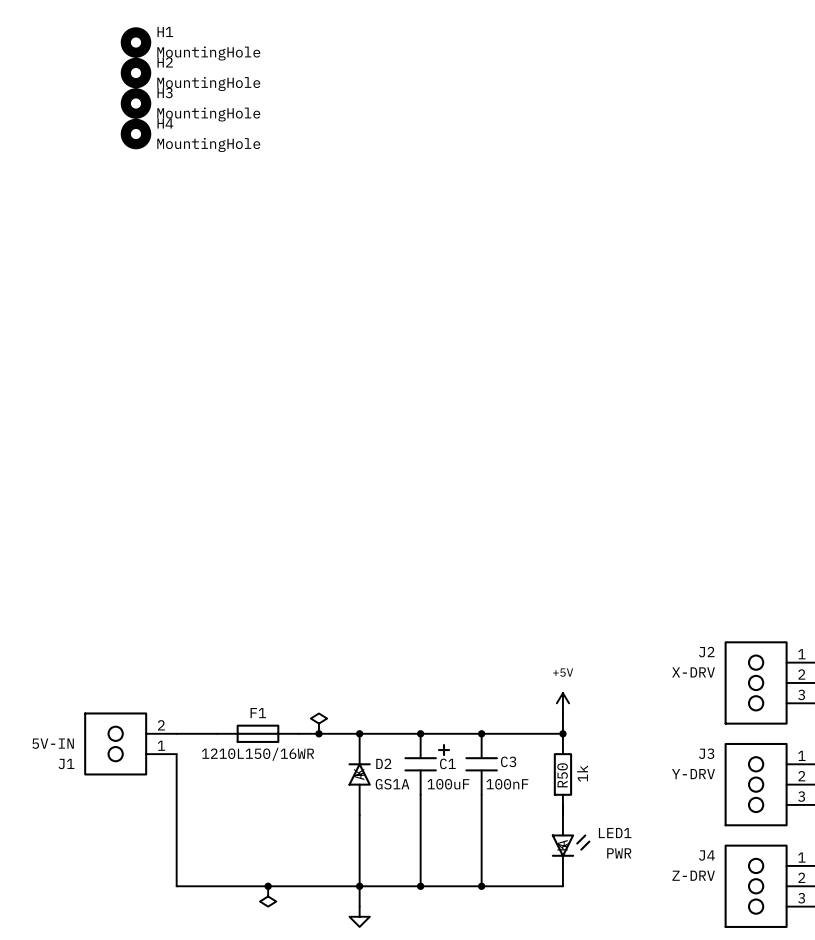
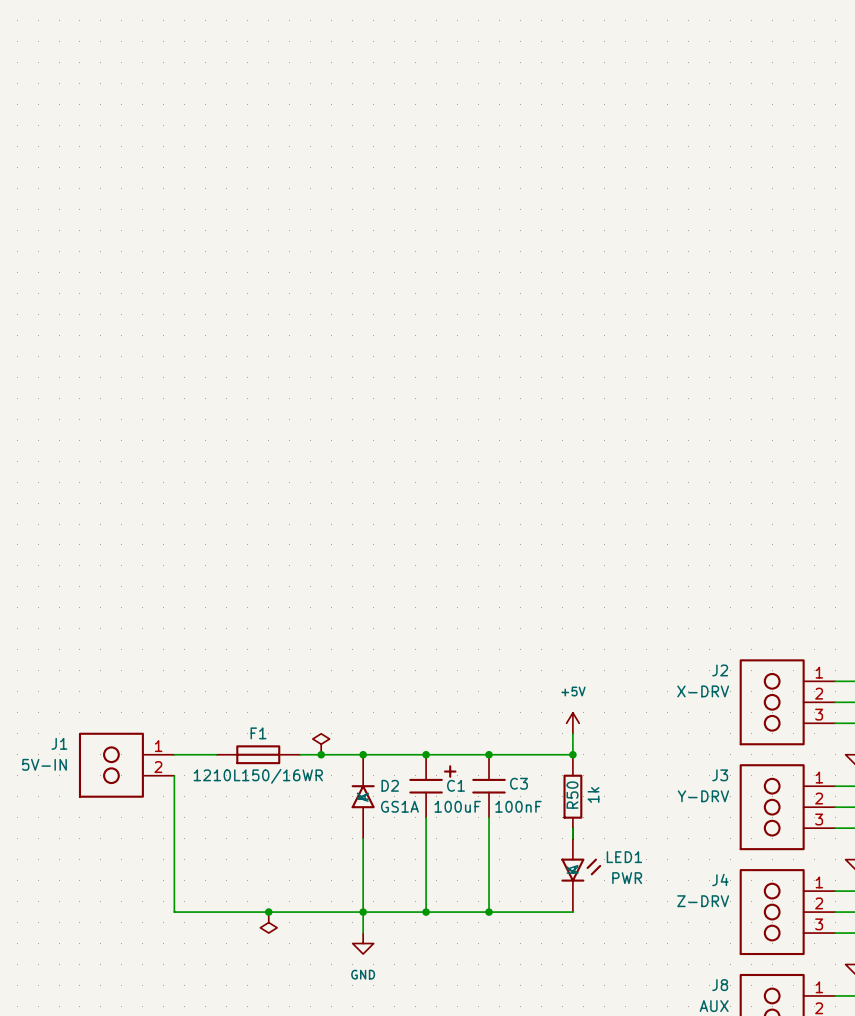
H1: MountingHole (136, 42) -> none
H2: MountingHole (136, 73) -> none
H3: MountingHole (136, 103) -> none
H4: MountingHole (136, 134) -> none
J1 flip: as is (115, 743) -> up-down (111, 765)

